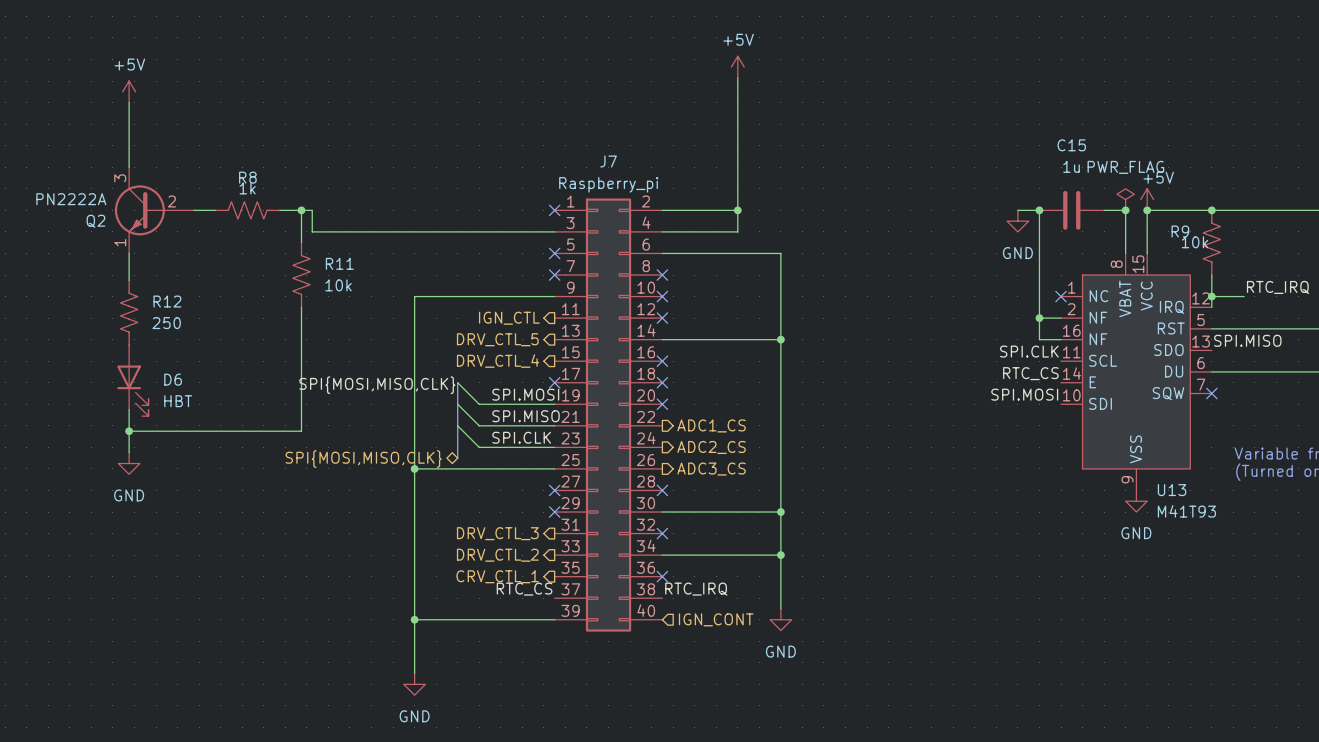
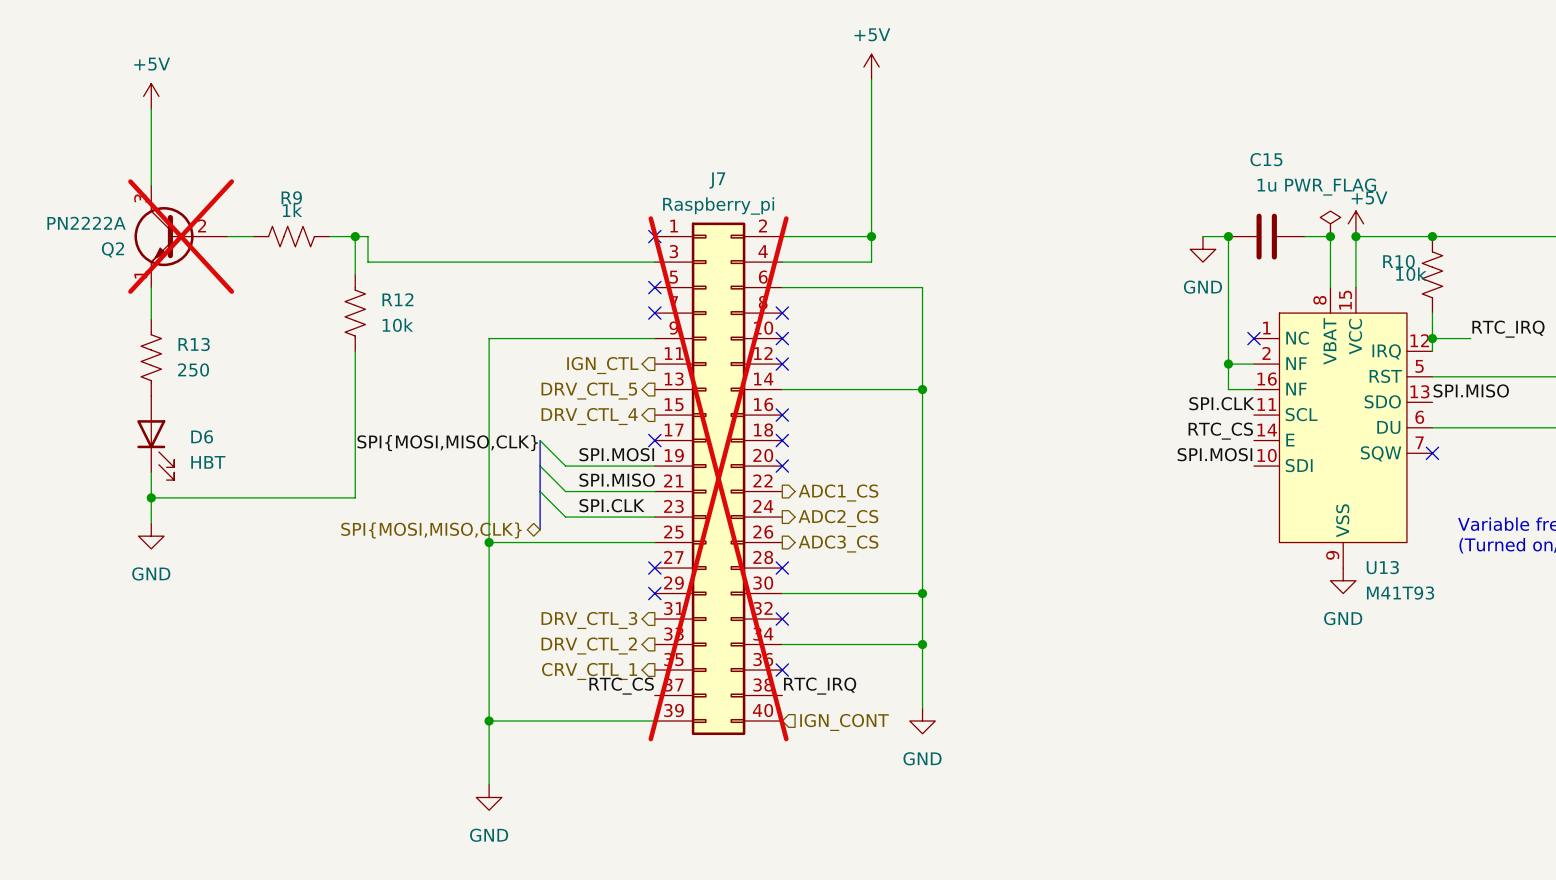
R8 name: R8 (247, 177) -> R9 (291, 197)
Q2 do-not-place cross: none -> (181, 236)
R9 name: R9 (1180, 231) -> R10 (1398, 261)
R11 name: R11 (339, 263) -> R12 (397, 299)
R12 name: R12 (167, 301) -> R13 (194, 344)
J7 do-not-place cross: none -> (718, 478)

